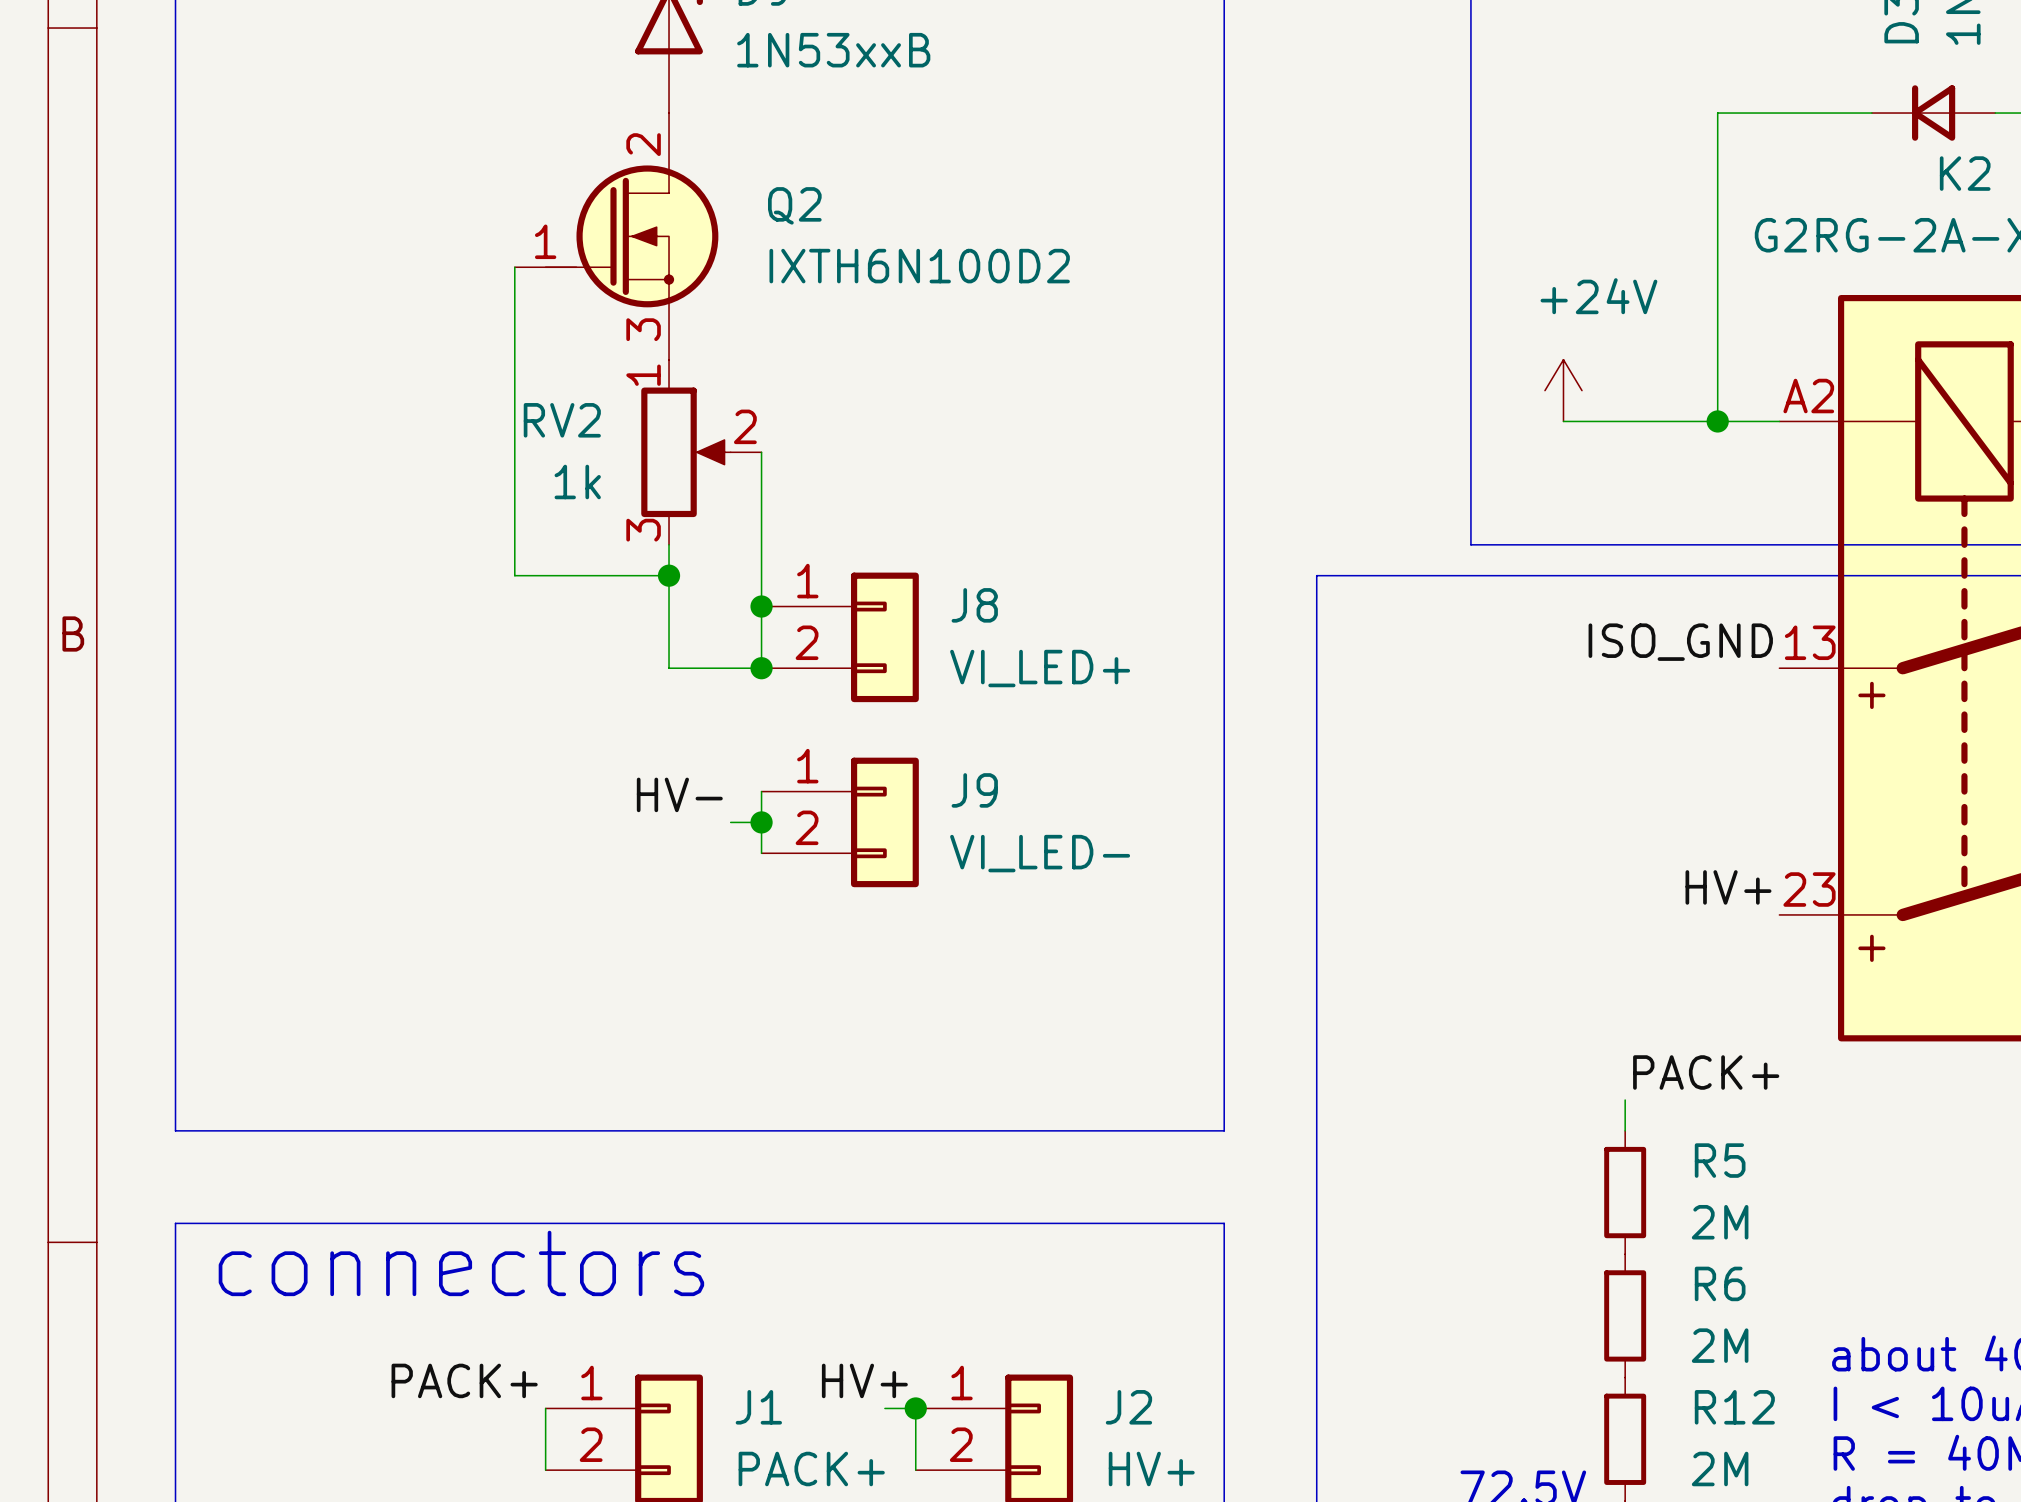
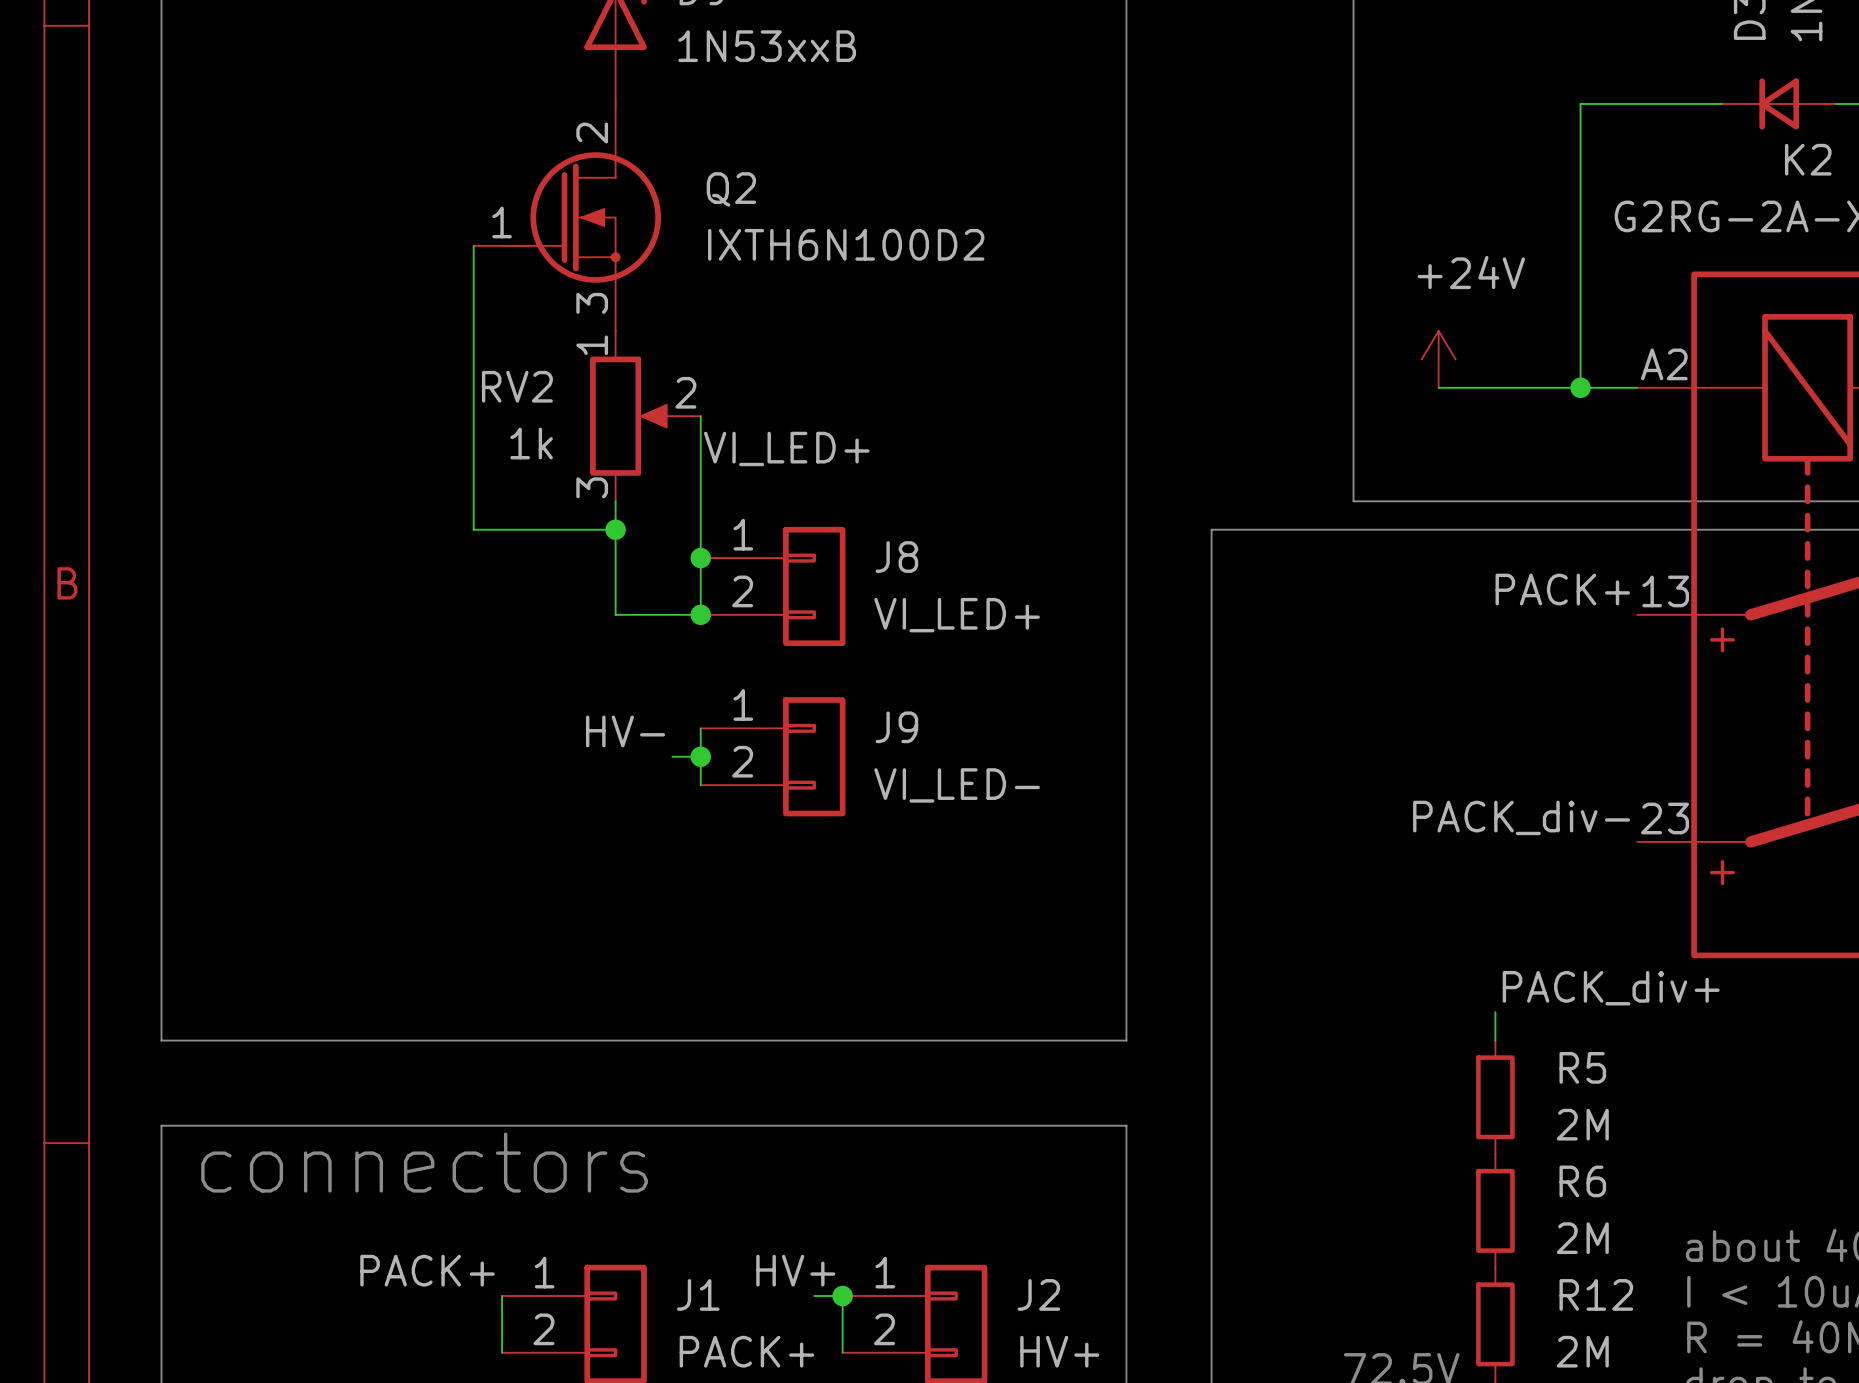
label: none -> VI_LED+ (786, 448)
label: ISO_GND (1680, 642) -> PACK+ (1562, 589)
label: HV+ (1728, 887) -> PACK_div- (1521, 817)
label: PACK+ (1706, 1072) -> PACK_div+ (1611, 988)

